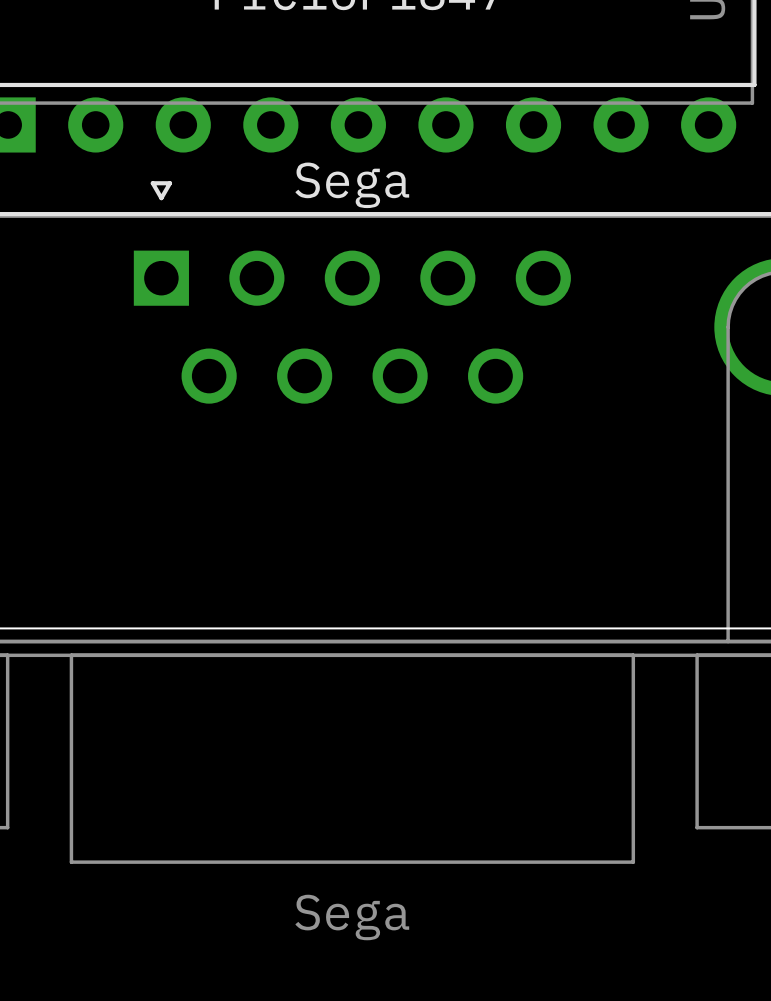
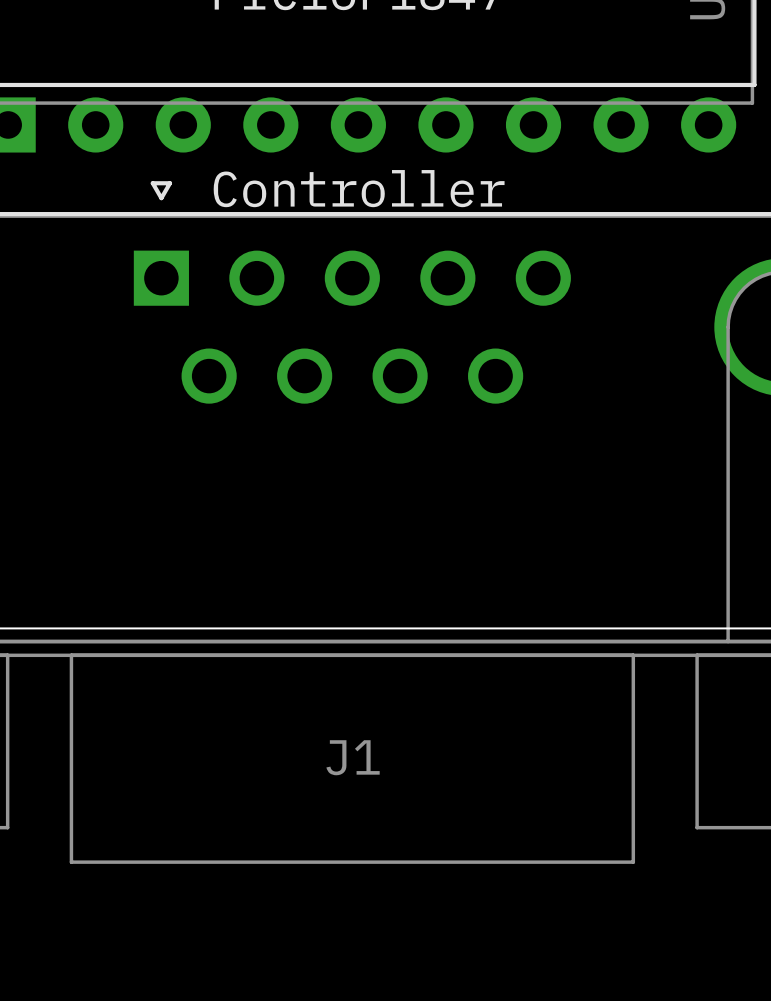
Sega name: Sega (352, 185) -> J1 (353, 757)
Sega value: Sega (352, 917) -> Controller (359, 188)

